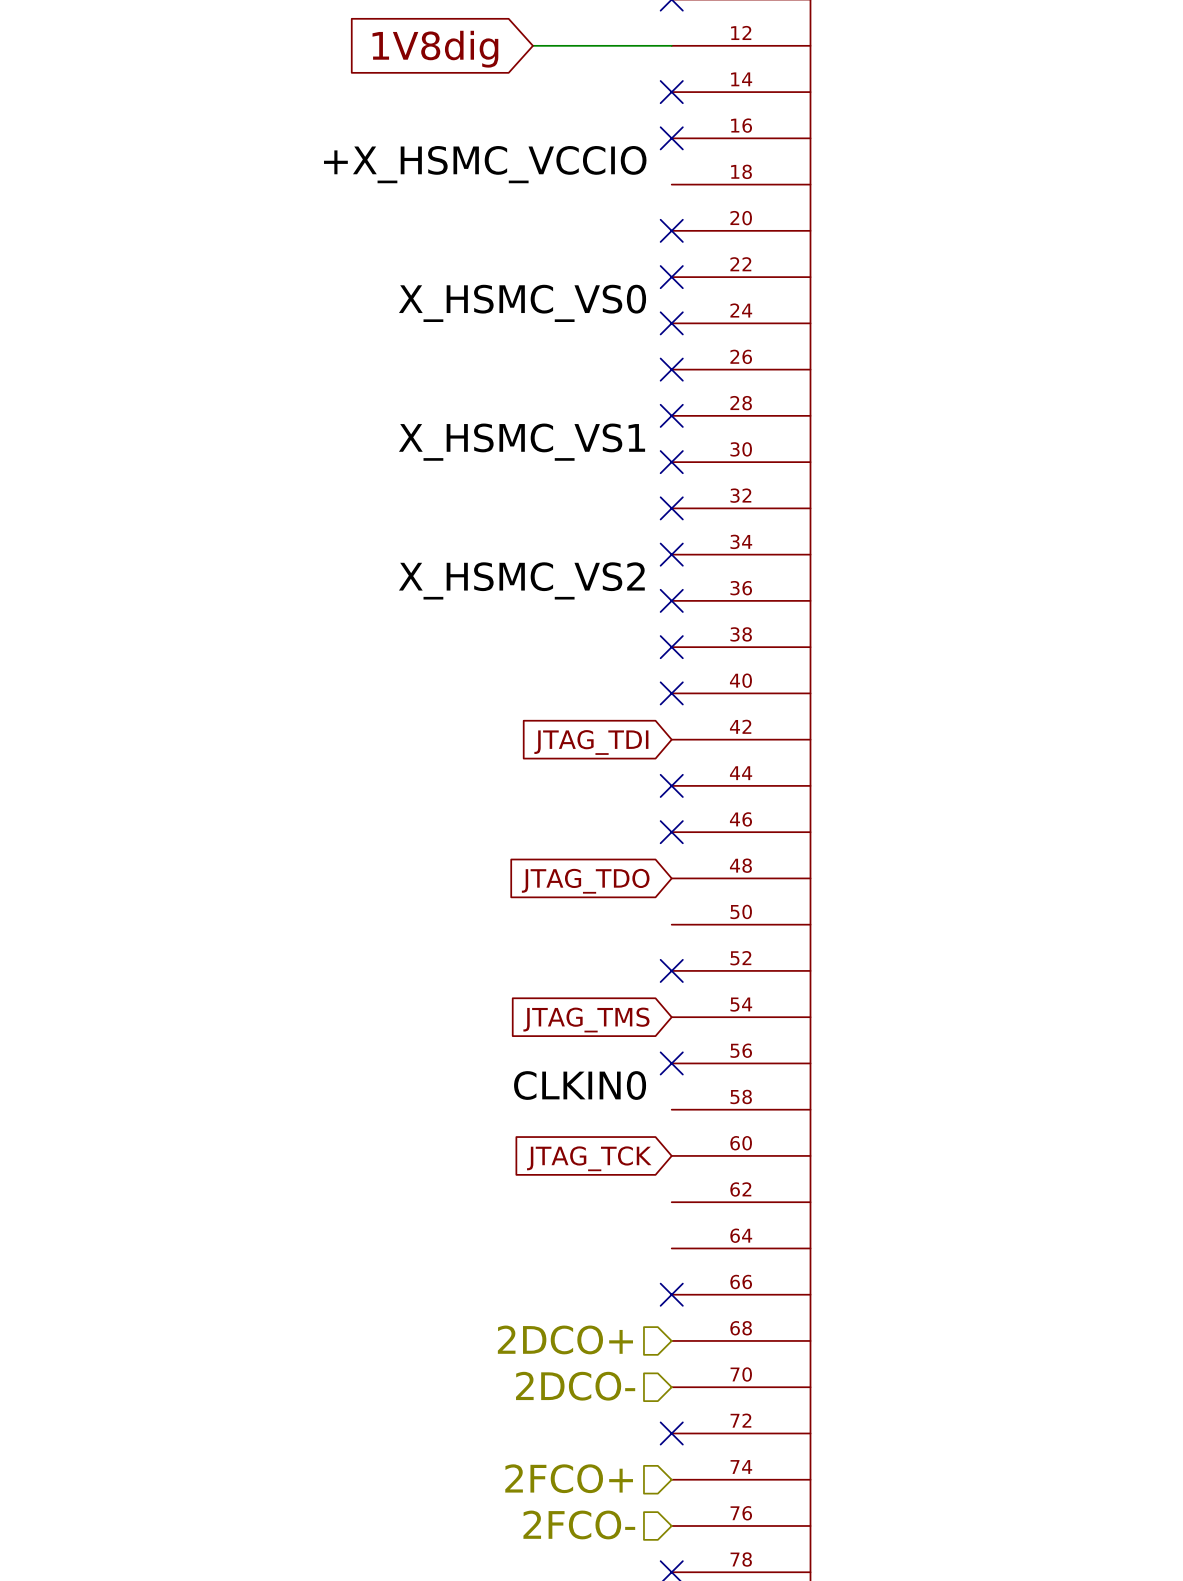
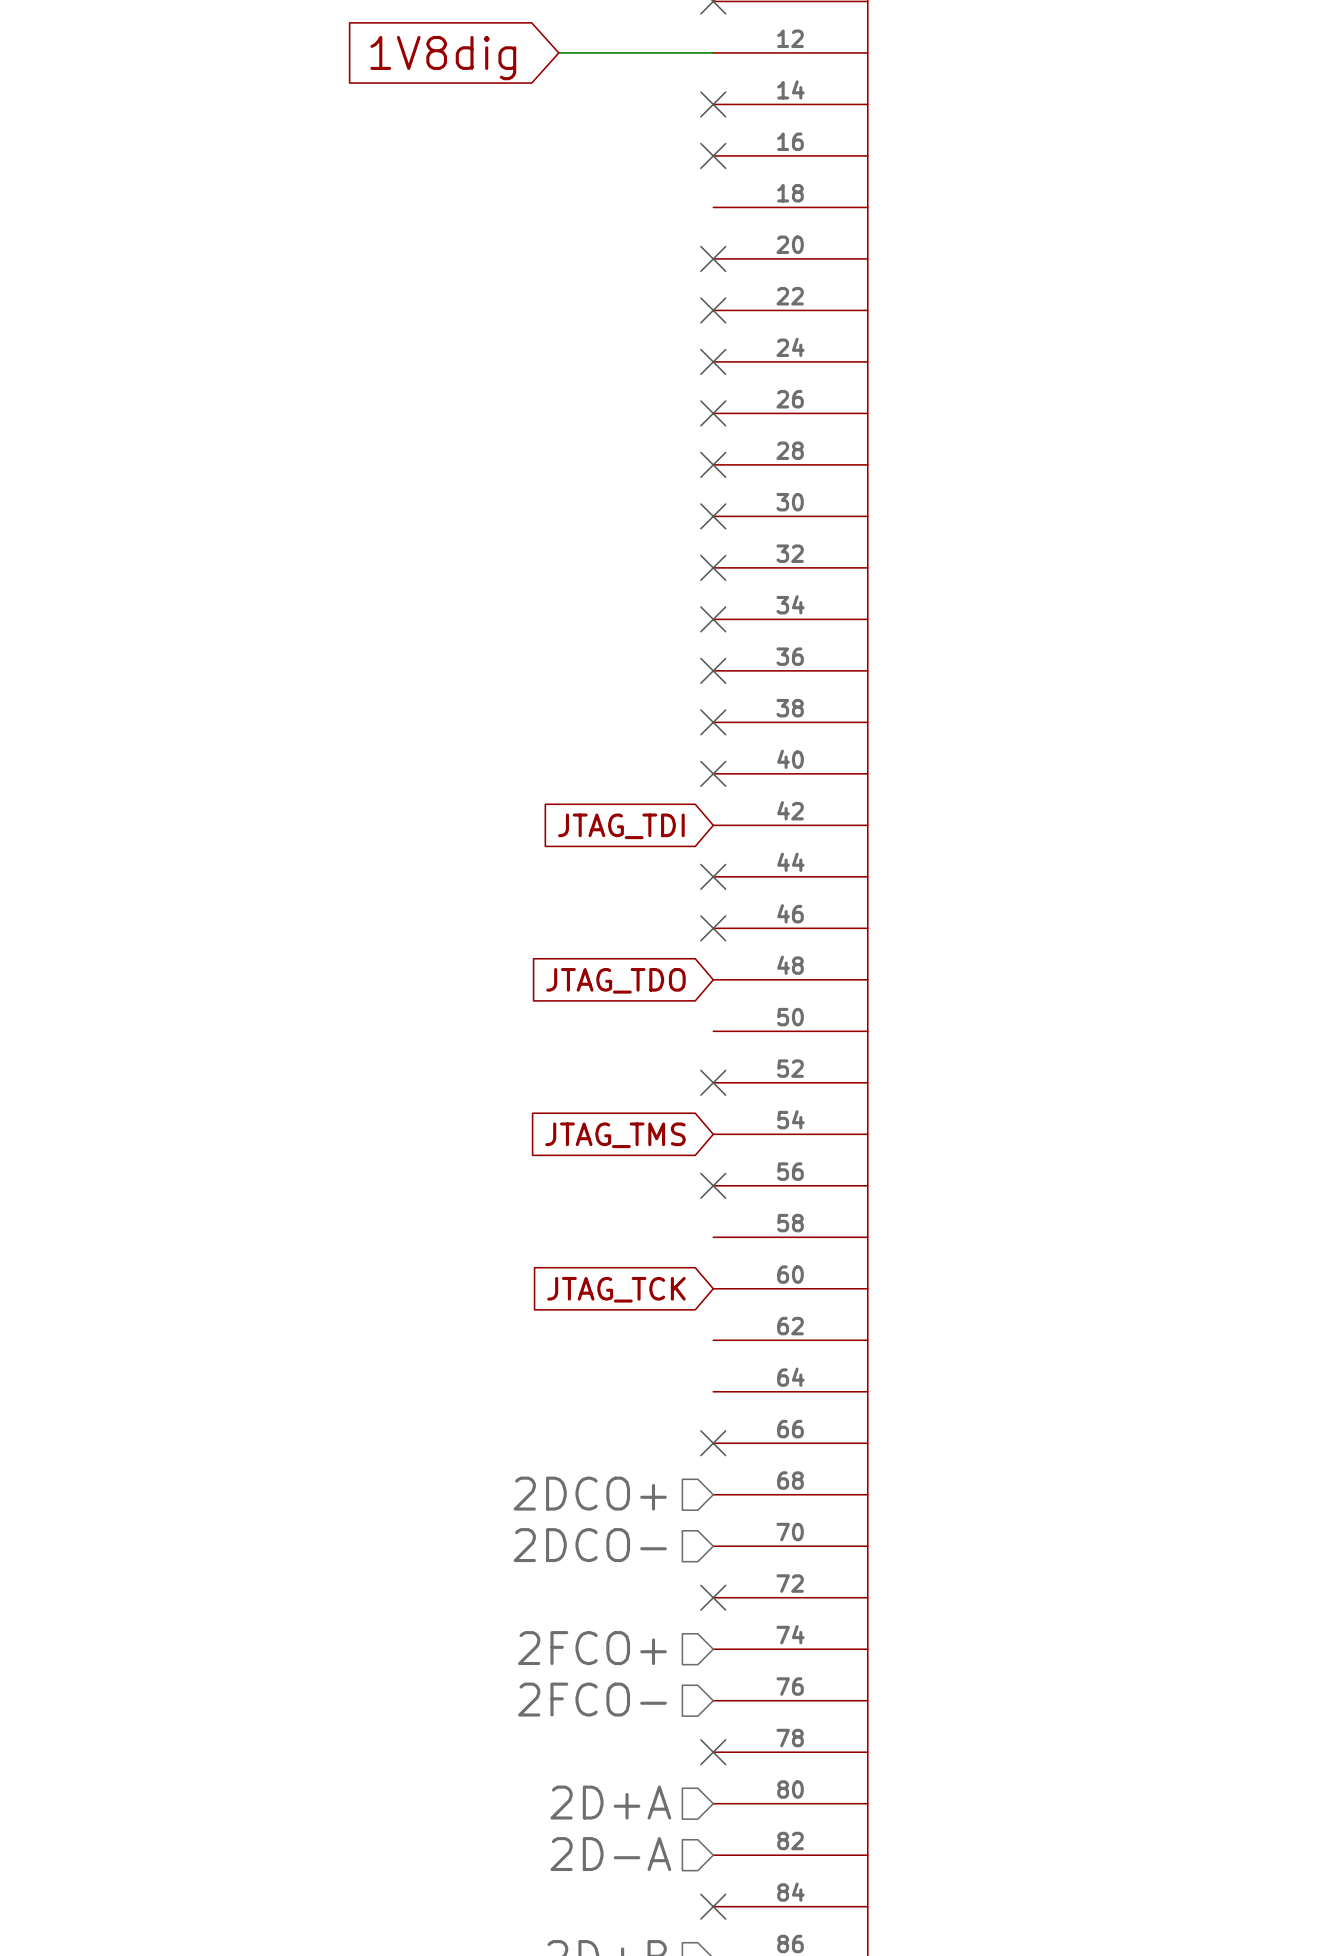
label: +X_HSMC_VCCIO (485, 164) -> none
label: X_HSMC_VS0 (522, 303) -> none
label: X_HSMC_VS1 (522, 442) -> none
label: X_HSMC_VS2 (521, 580) -> none
label: CLKIN0 (580, 1085) -> none

